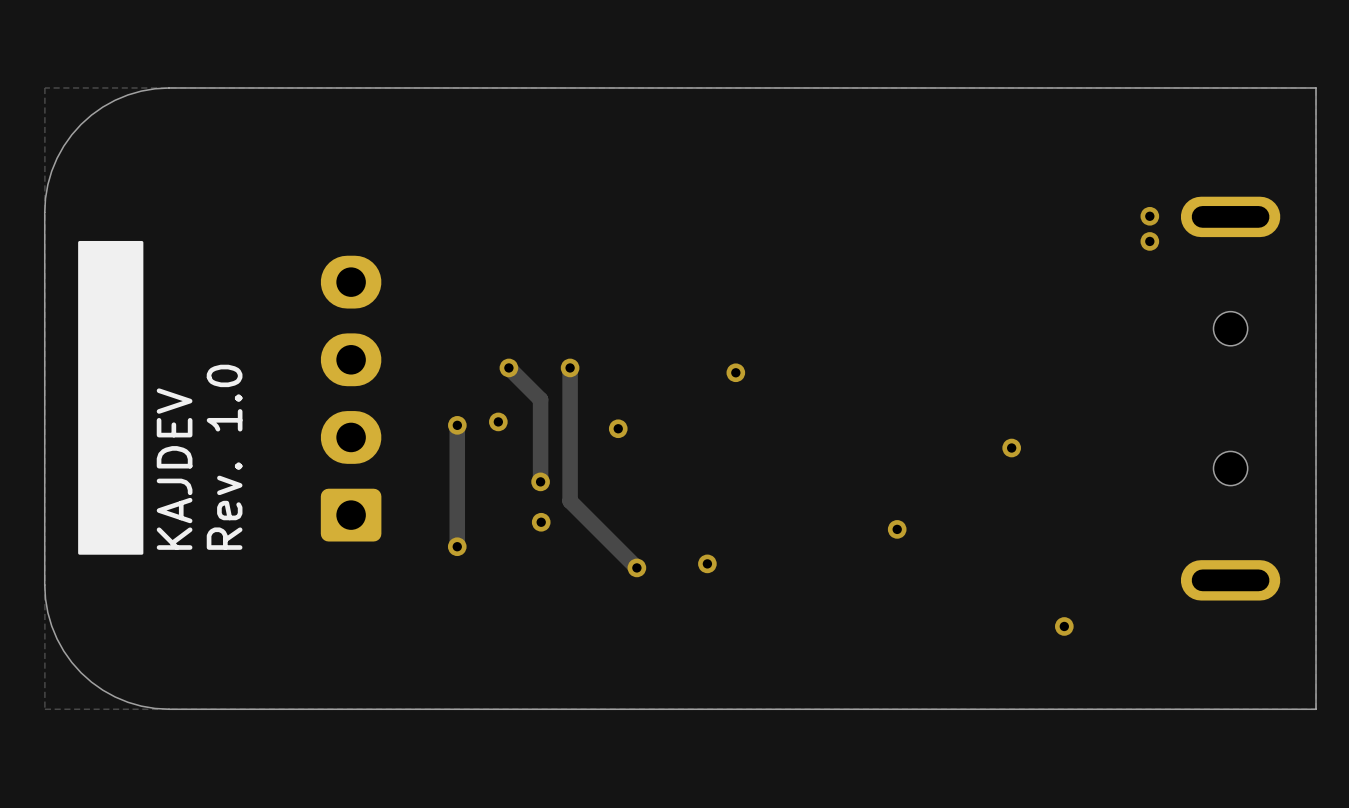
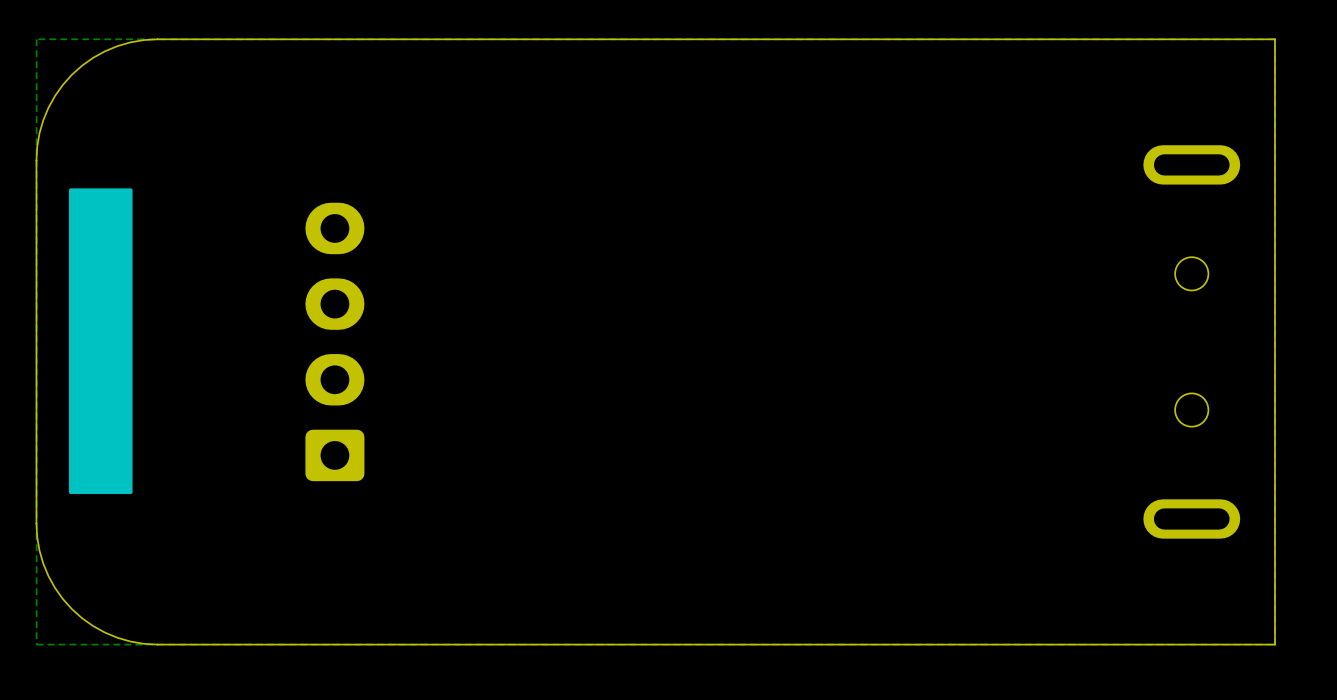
via: (1149, 216) -> none
via: (1149, 241) -> none
track: (508, 367) (540, 399) (540, 481) -> none
via: (508, 367) -> none
track: (570, 367) (570, 501) (636, 567) -> none
via: (570, 367) -> none
via: (735, 372) -> none
via: (498, 421) -> none
track: (457, 425) (457, 546) -> none
via: (457, 425) -> none
via: (618, 428) -> none
via: (1011, 448) -> none
text: Rev. 1.0 (224, 457) -> none
text: KAJDEV (174, 469) -> none
via: (540, 481) -> none
via: (541, 522) -> none
via: (897, 529) -> none
via: (457, 546) -> none
via: (707, 563) -> none
via: (636, 567) -> none
via: (1064, 626) -> none

